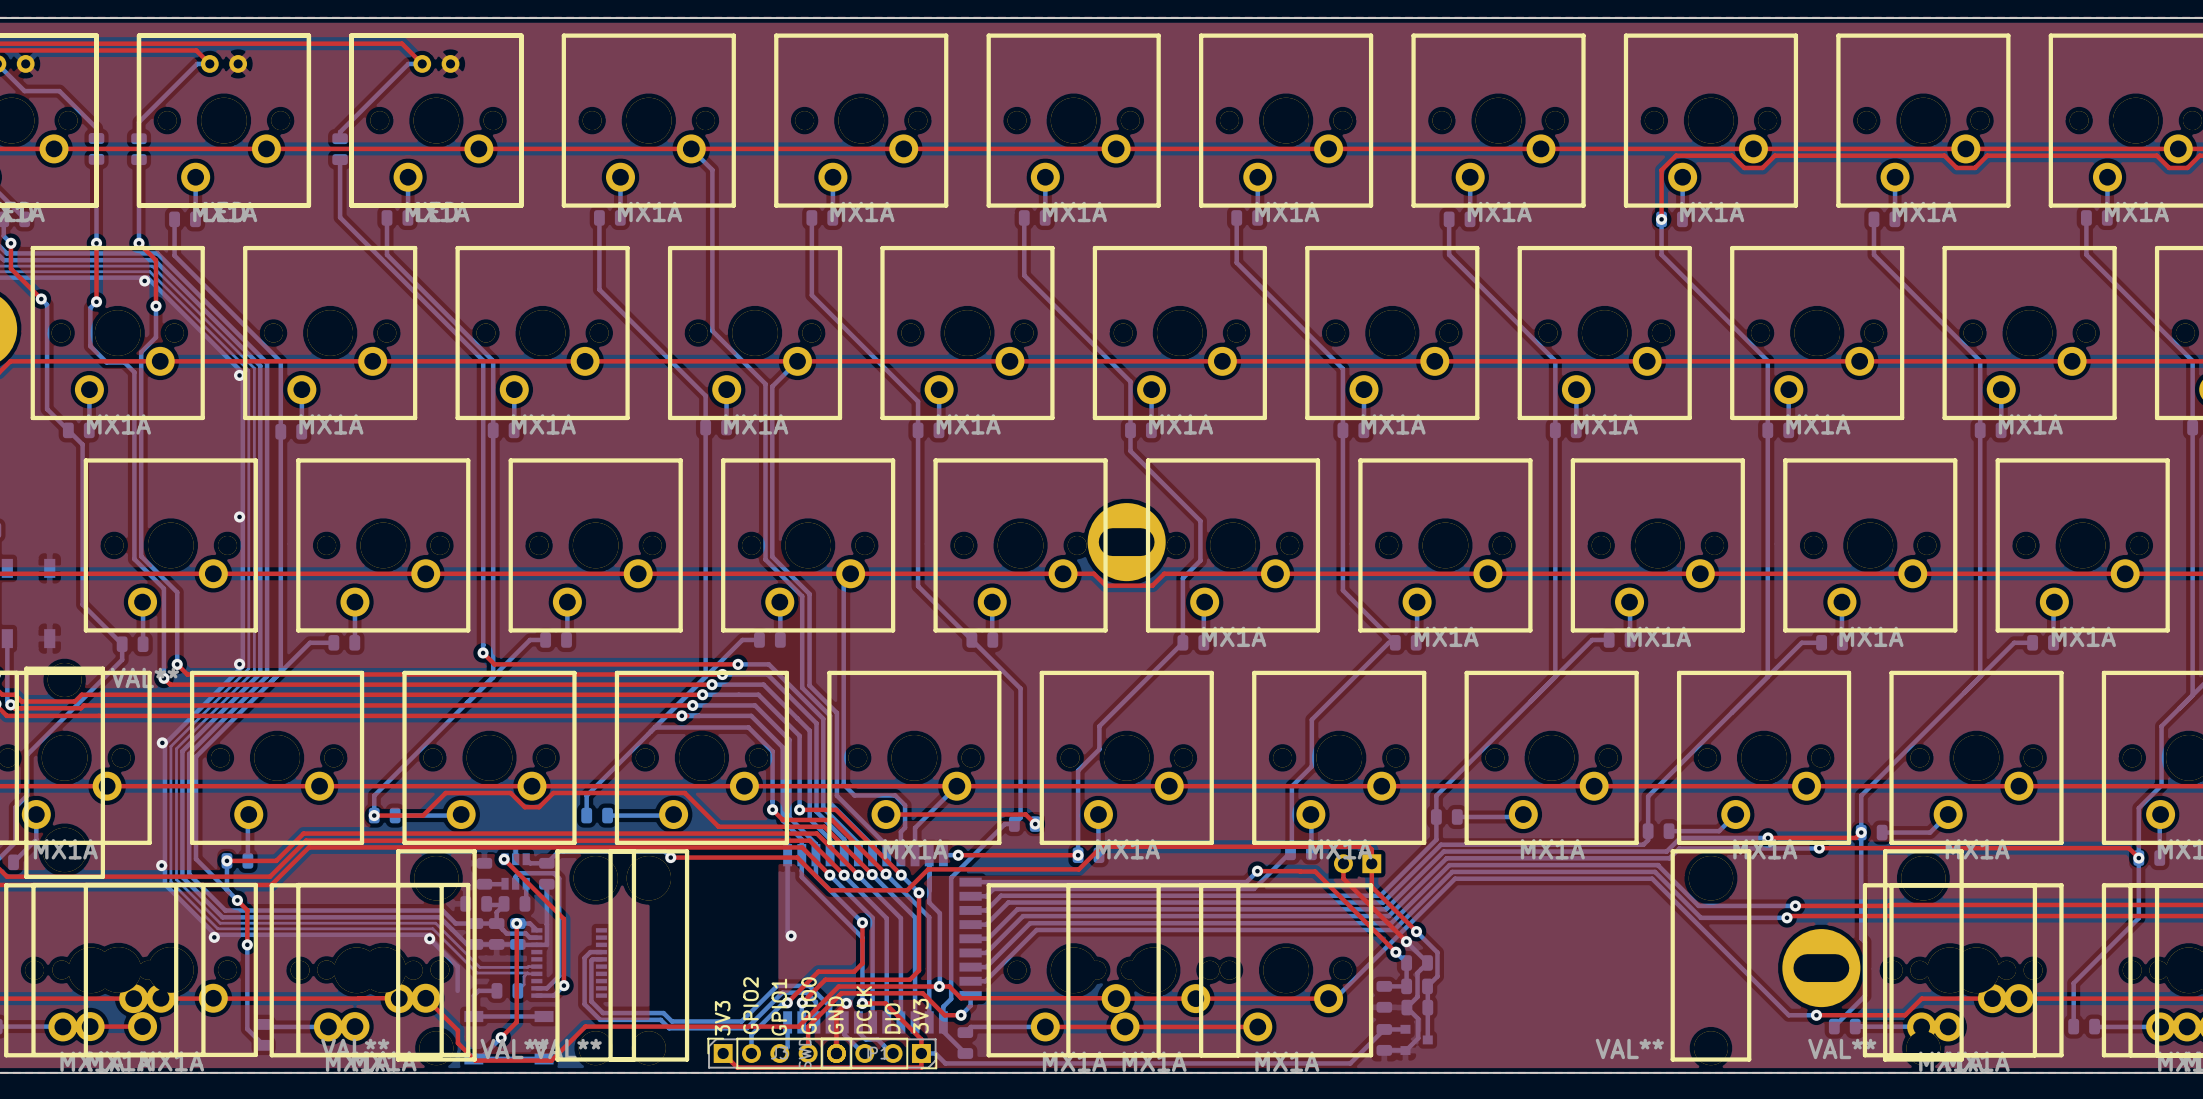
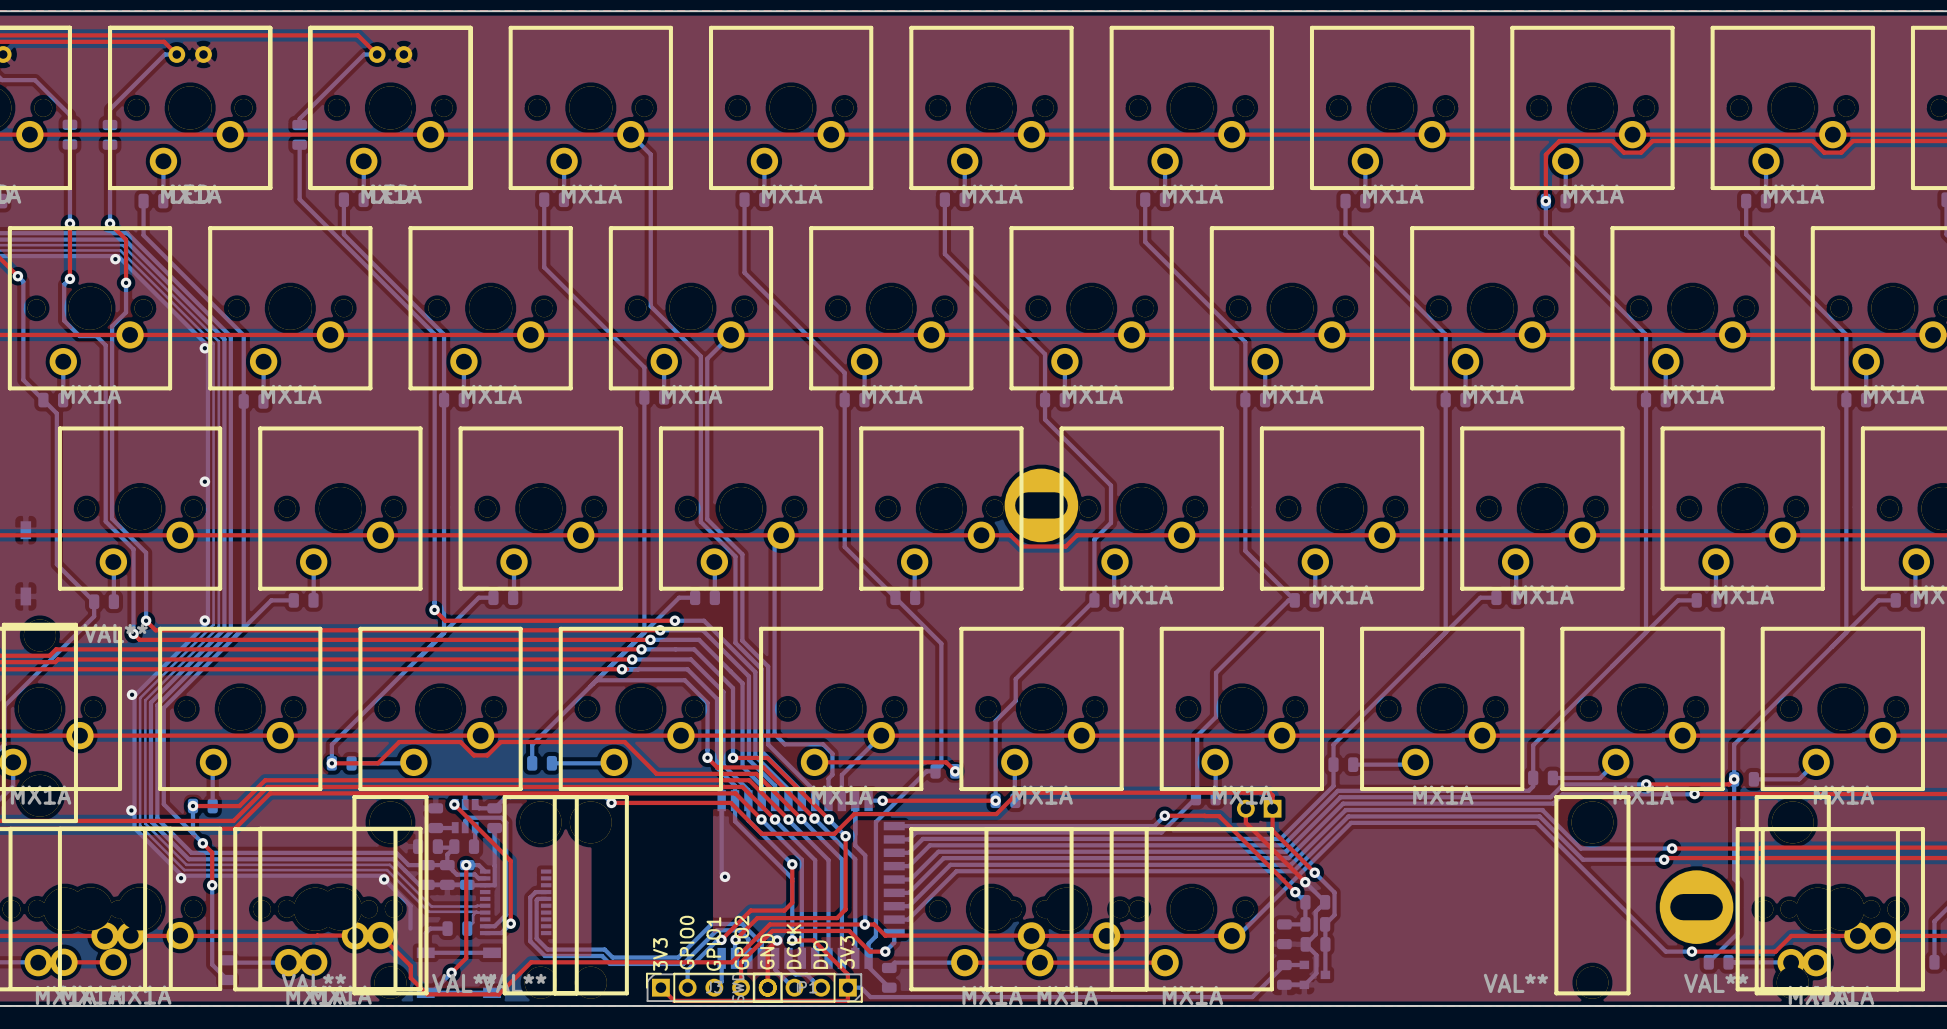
text: GPIO2 (750, 1005) -> GPIO0 (687, 942)
text: GPIO0 (809, 1005) -> GPIO2 (741, 942)

